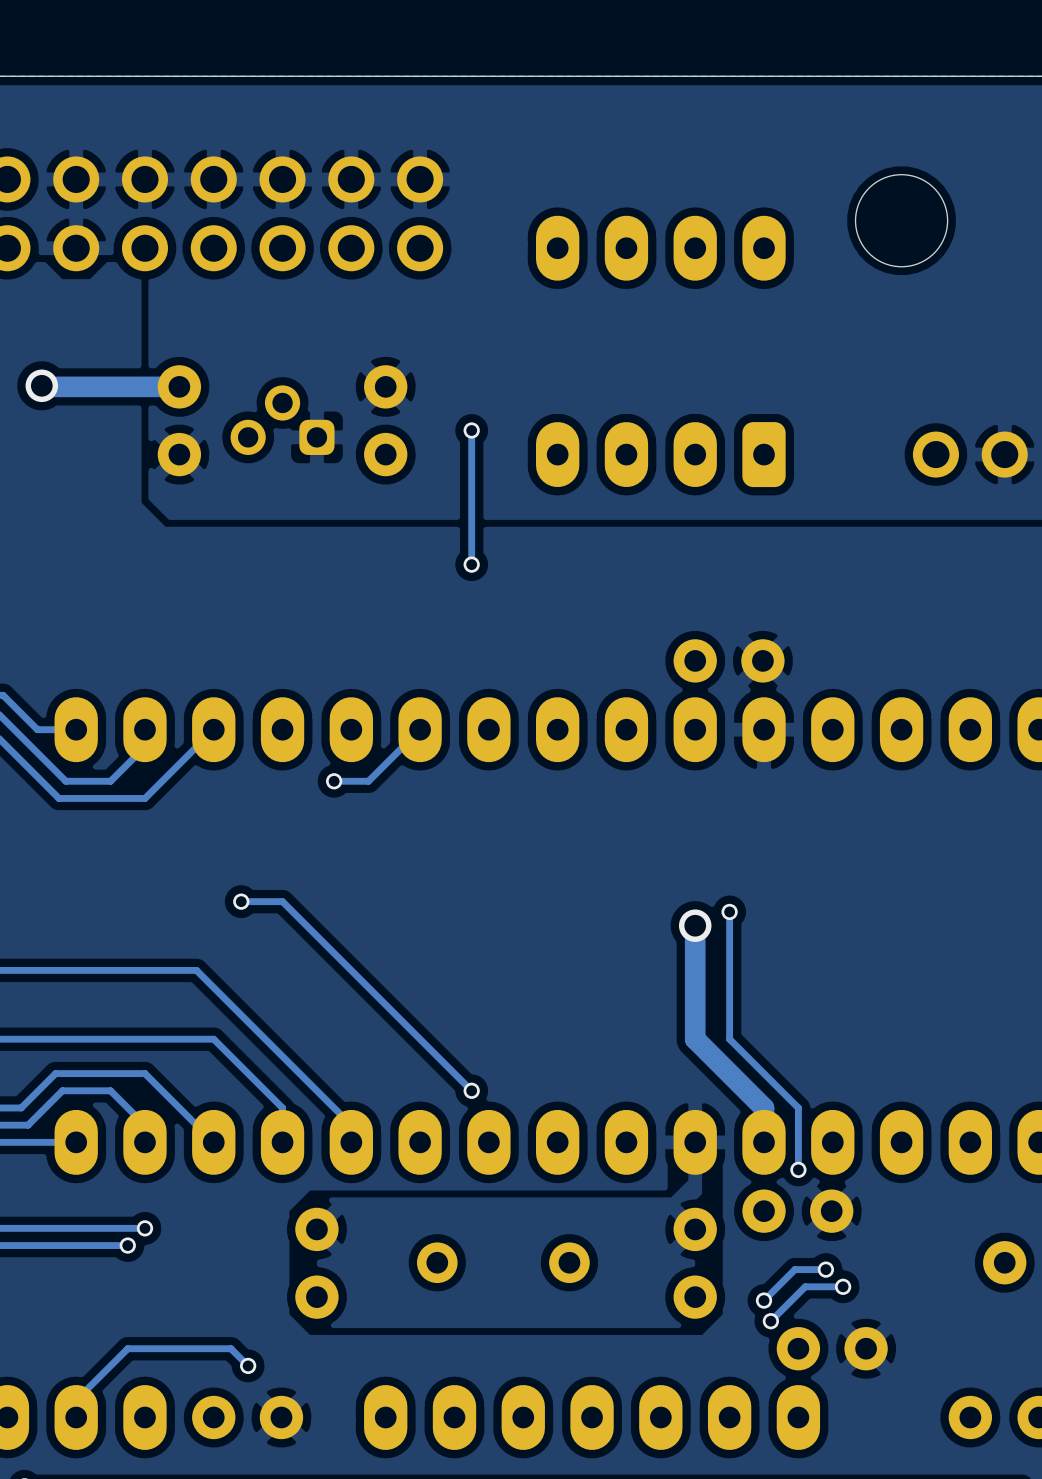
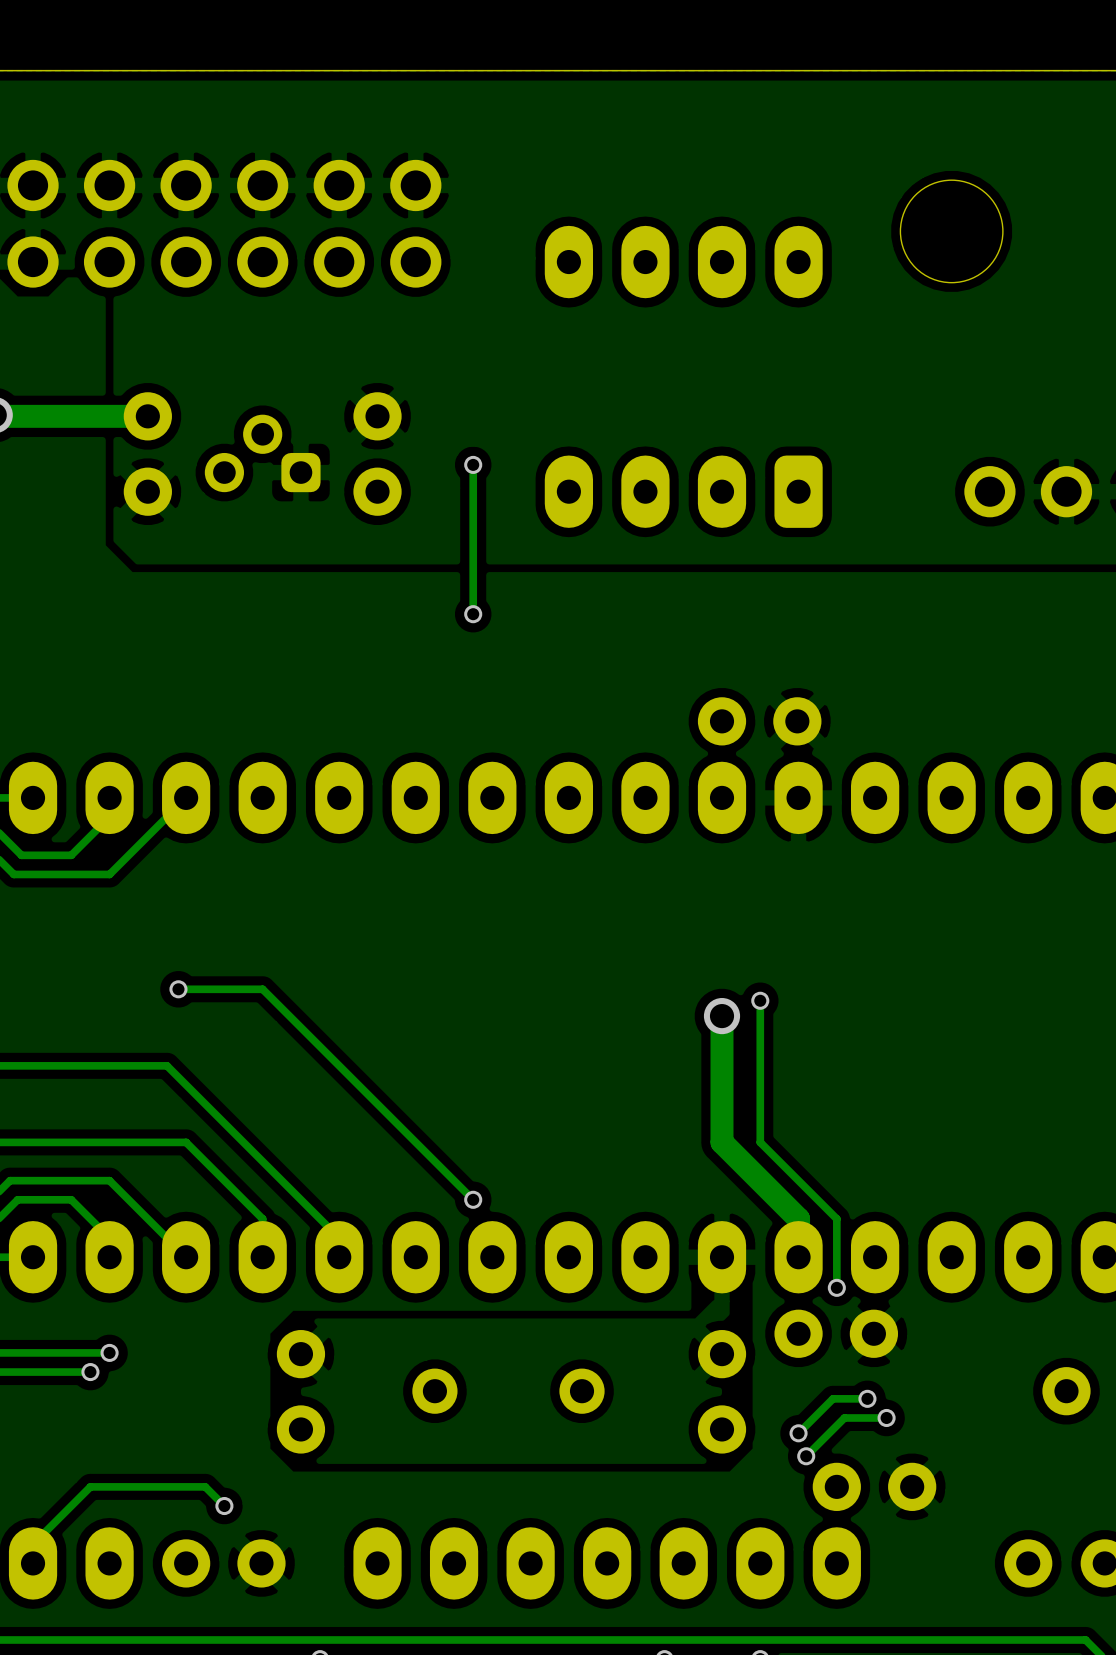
track: (420, 729) (368, 781) (334, 781) -> none
via: (334, 781) -> none
track: none -> (216, 989) (178, 989)
via position: (241, 901) -> (178, 989)

